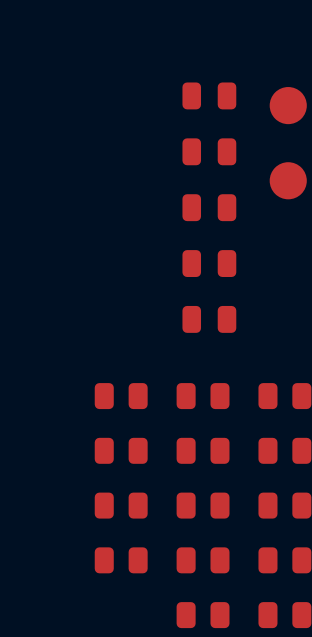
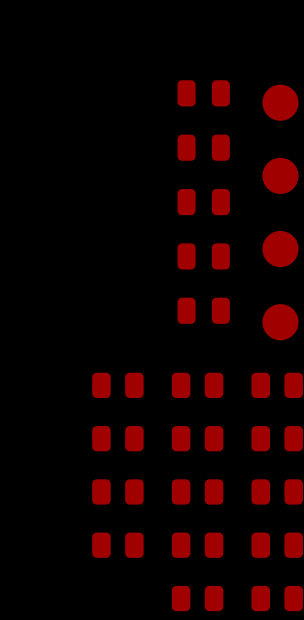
part: none -> (280, 249)
part: none -> (280, 322)

